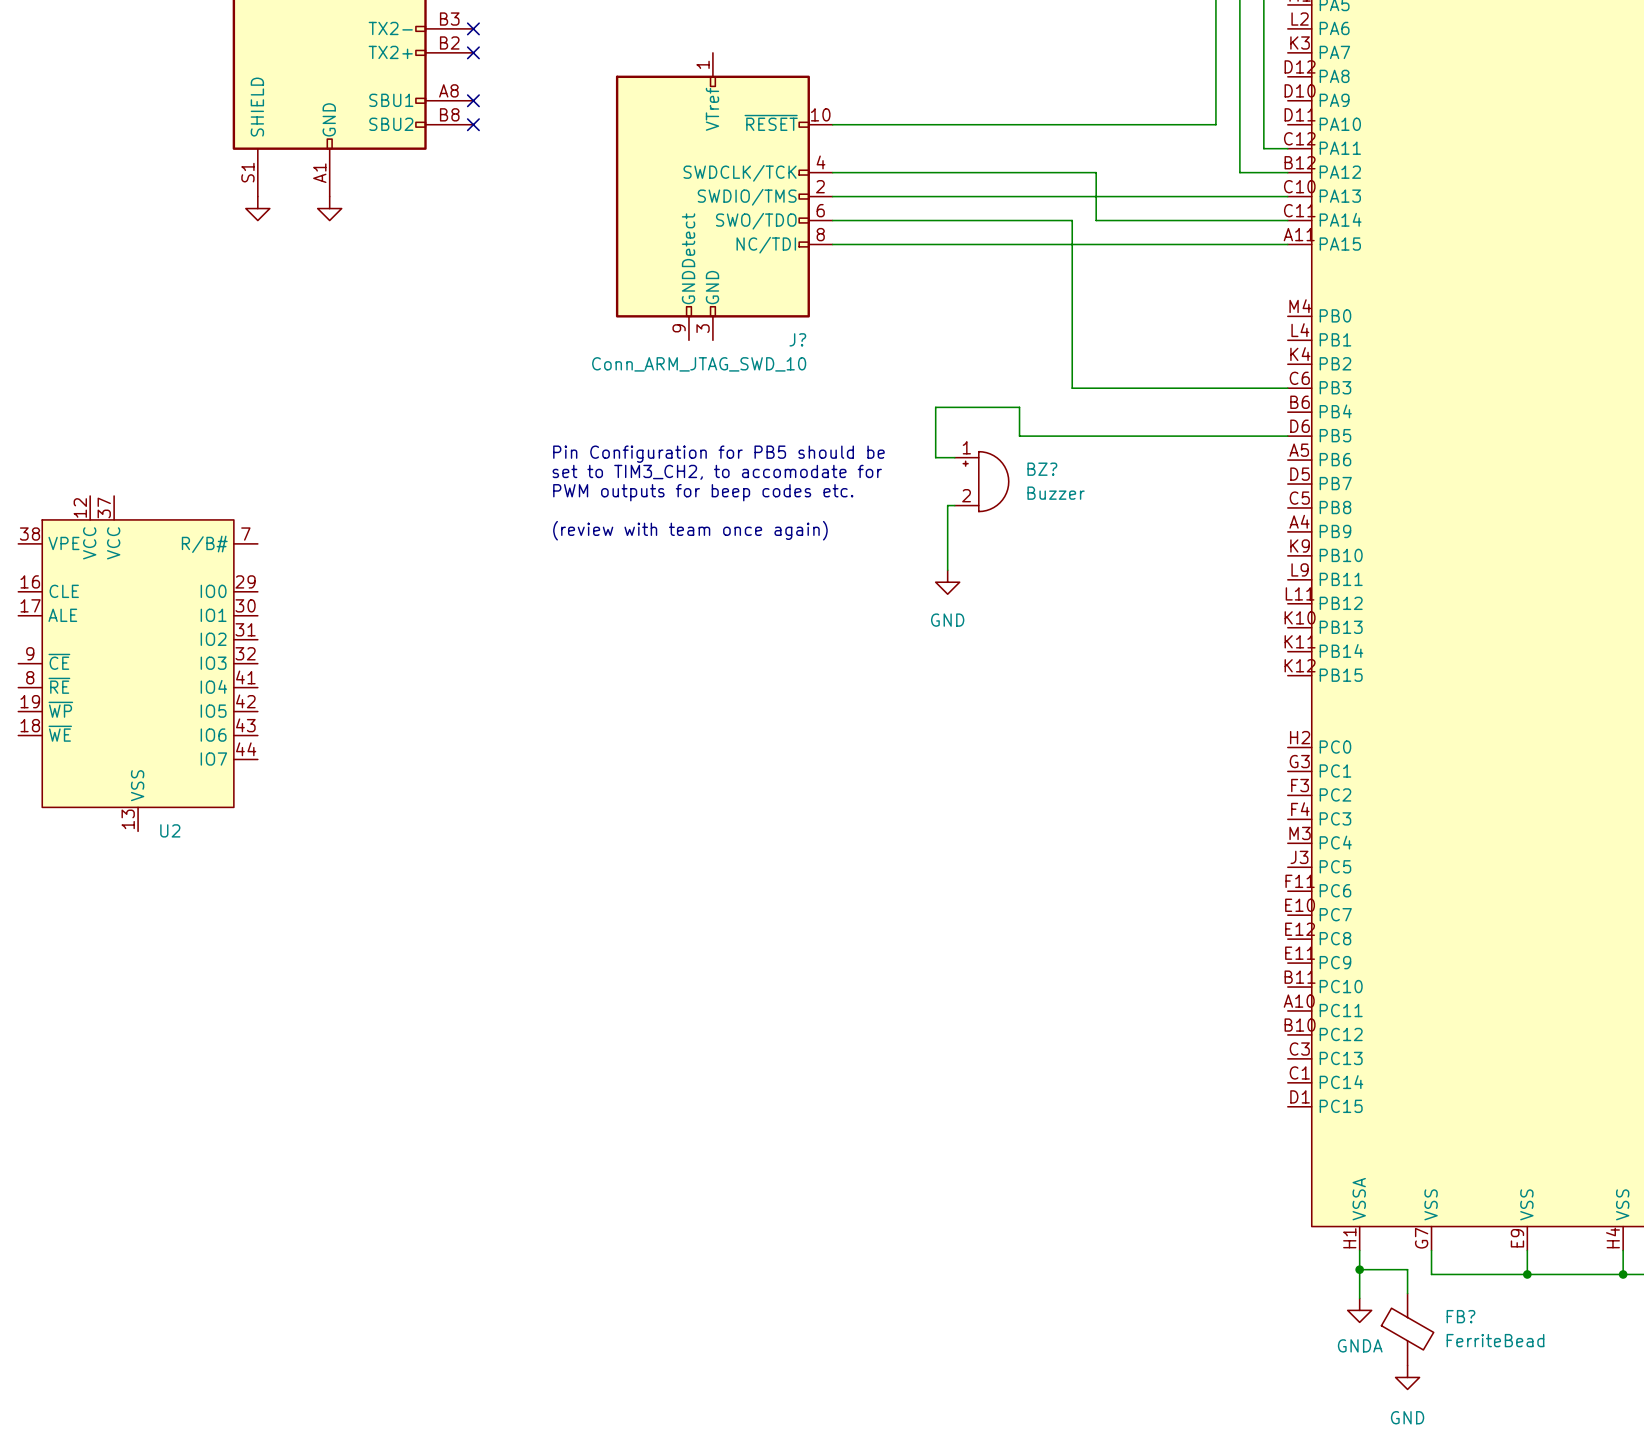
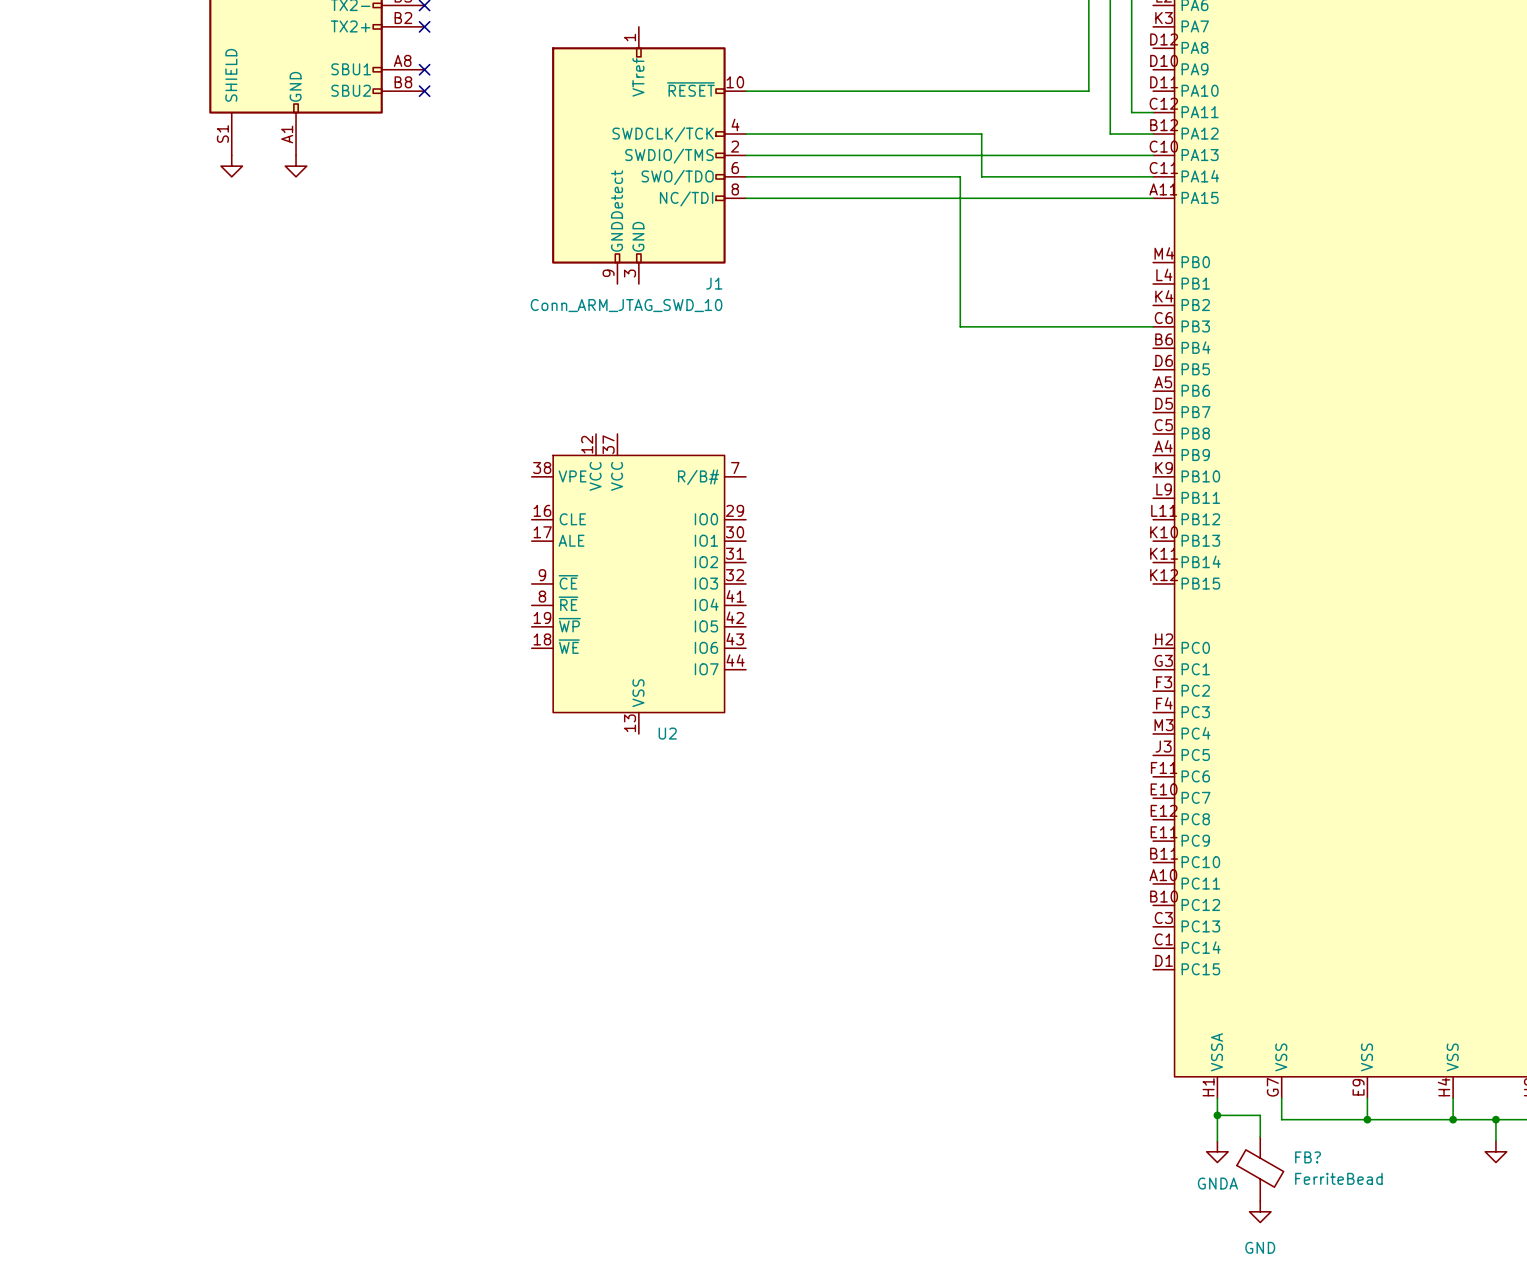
J? name: J? (797, 339) -> J1 (714, 283)
wire: (1287, 436) (1019, 436) (1019, 407) (935, 407) (935, 457) (954, 457) -> none
text: Pin Configuration for PB5 should be (718, 454) -> none
text: set to TIM3_CH2, to accomodate for (717, 472) -> none
BZ?: Buzzer (981, 481) -> none
text: PWM outputs for beep codes etc. (703, 492) -> none
wire: (954, 505) (947, 505) (947, 570) -> none
text: (review with team once again) (690, 530) -> none
power symbol: GND (947, 582) -> none
U2 position: (138, 663) -> (638, 583)

